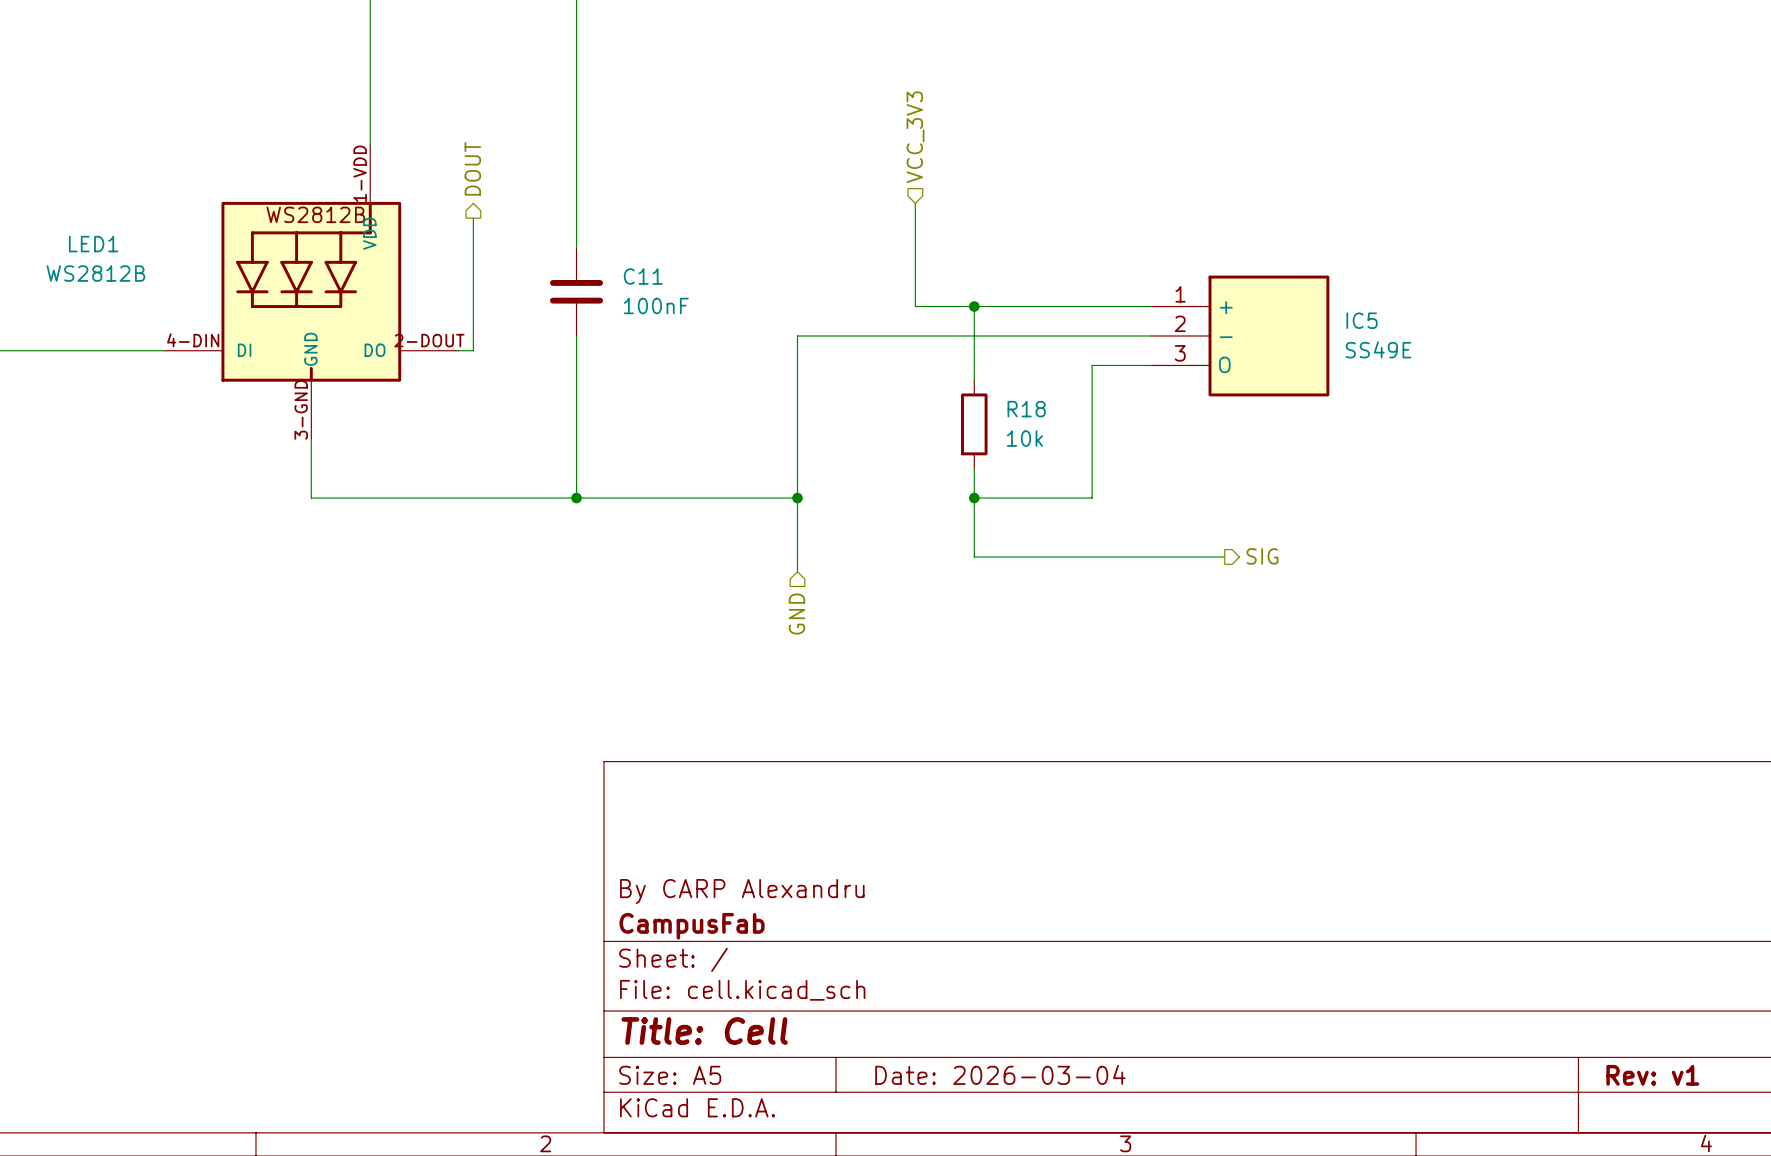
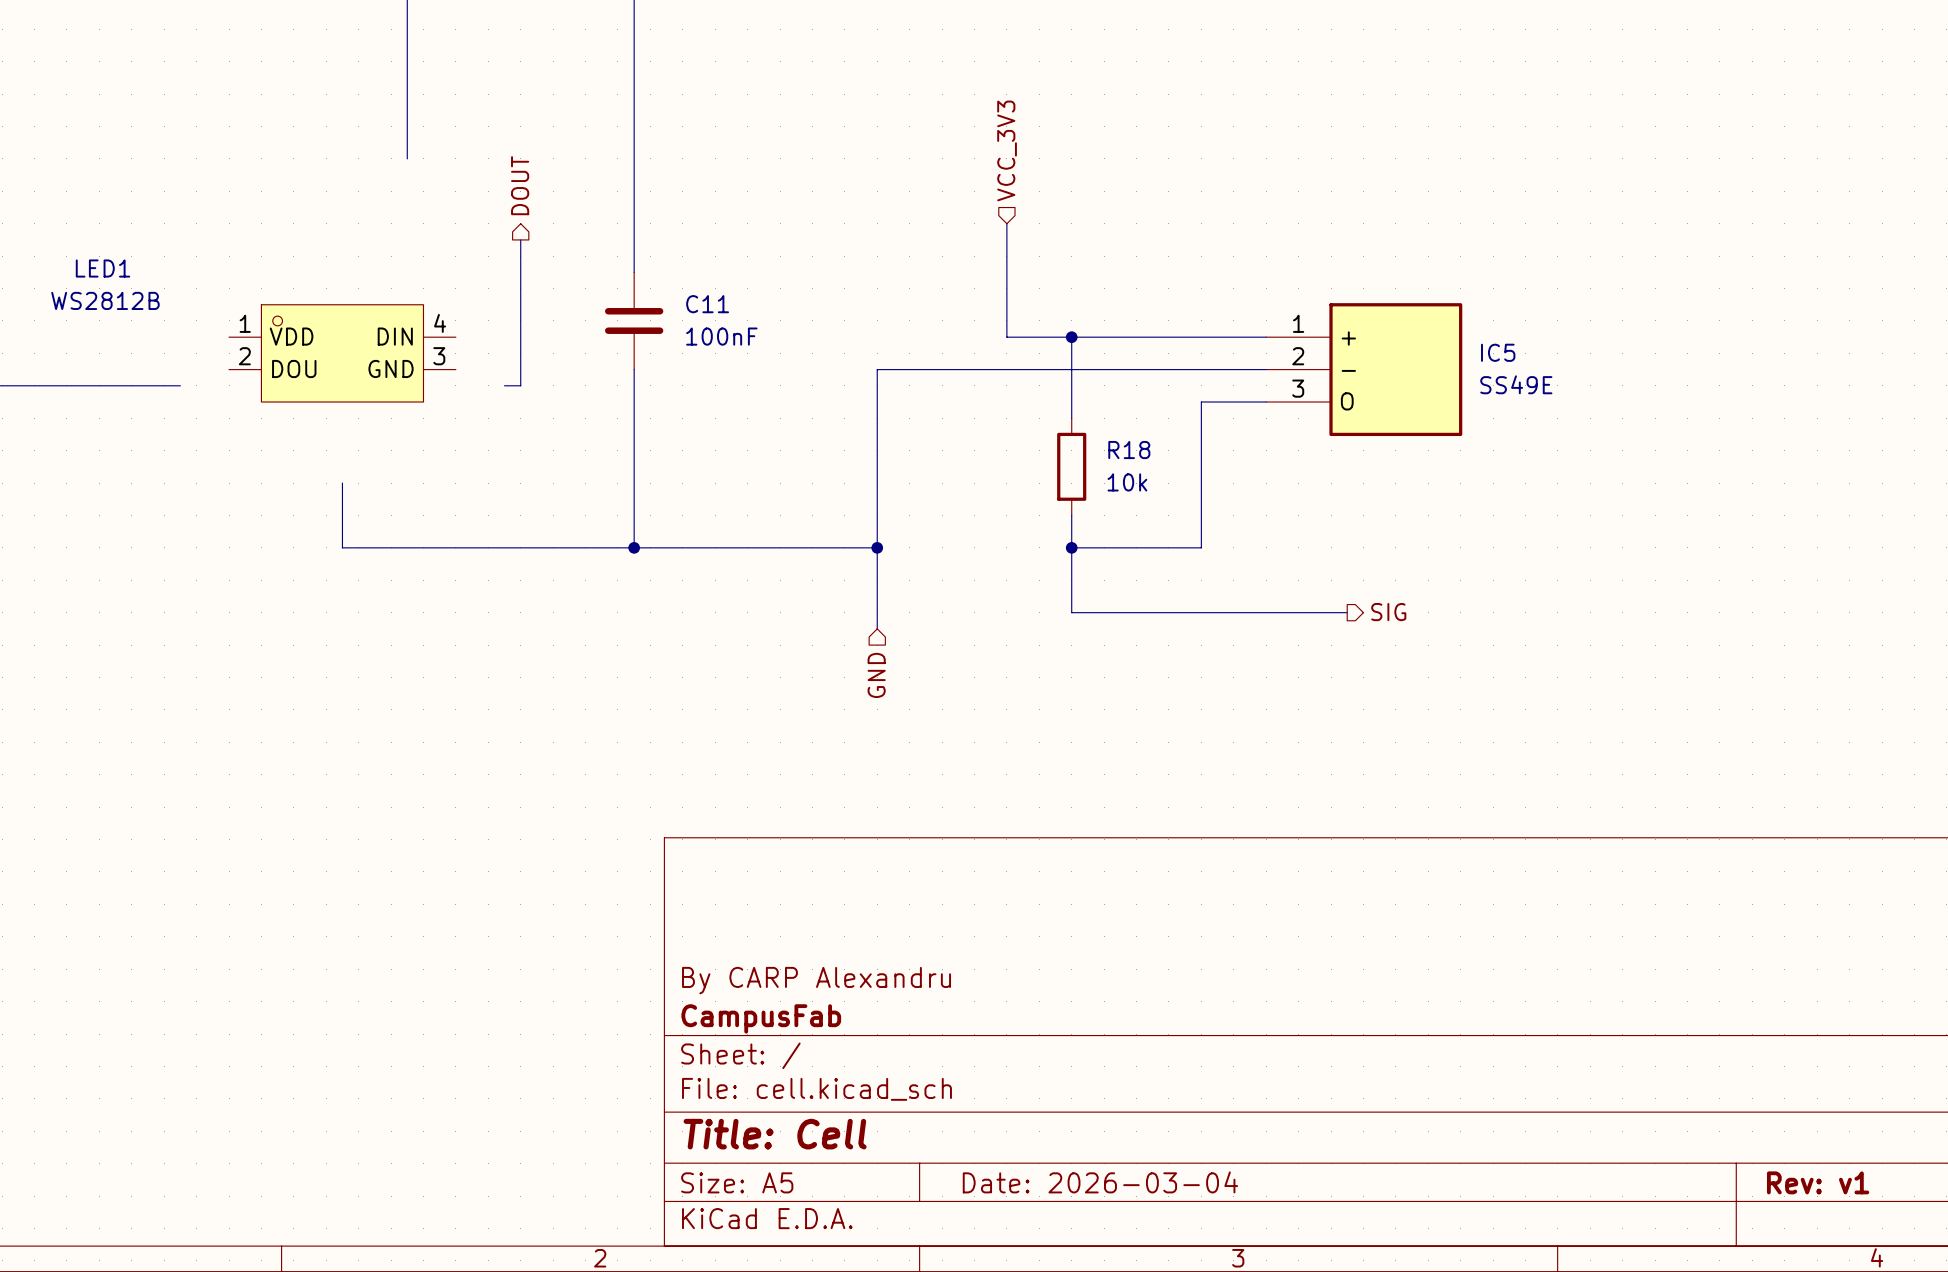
LED1 symbol: [164, 144, 459, 440] -> [229, 304, 456, 403]

